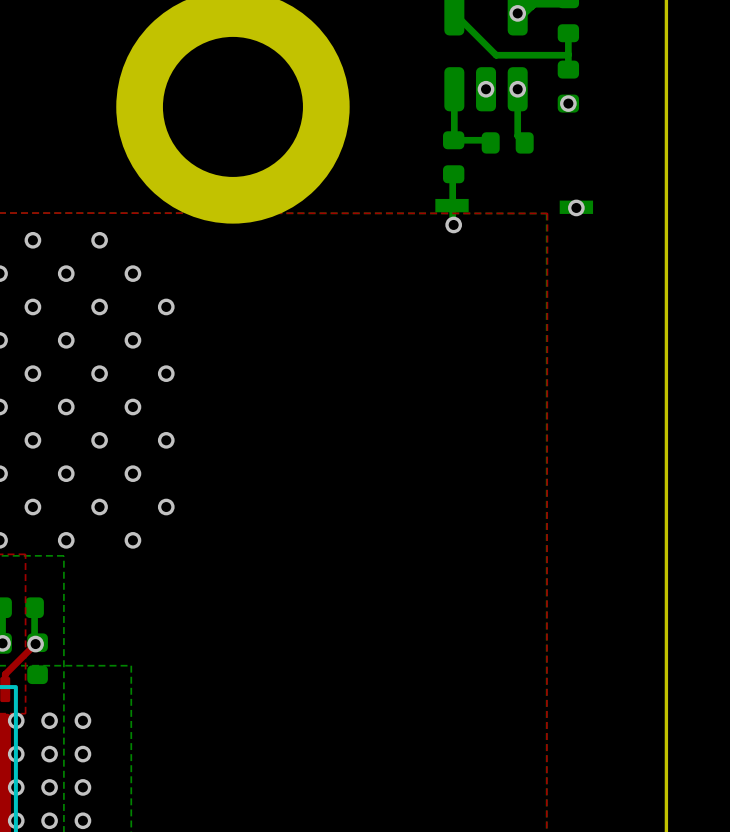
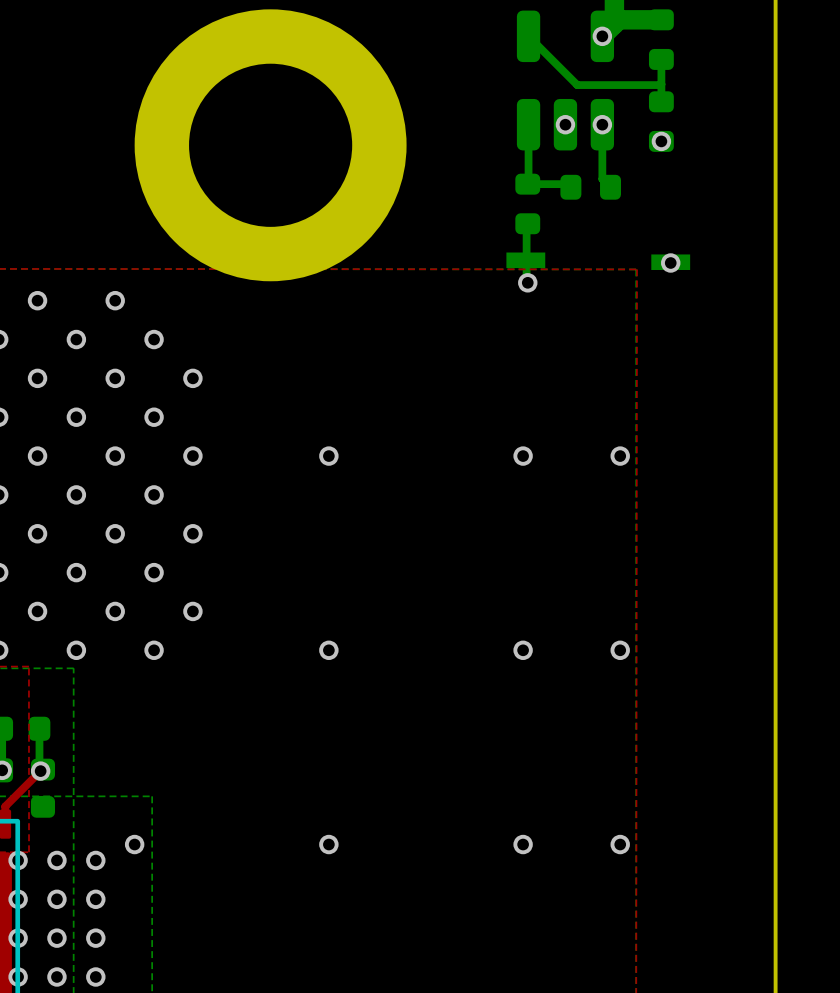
via: none -> (328, 456)
via: none -> (523, 456)
via: none -> (620, 456)
via: none -> (328, 650)
via: none -> (523, 650)
via: none -> (620, 650)
via: none -> (134, 844)
via: none -> (328, 844)
via: none -> (523, 844)
via: none -> (620, 844)

